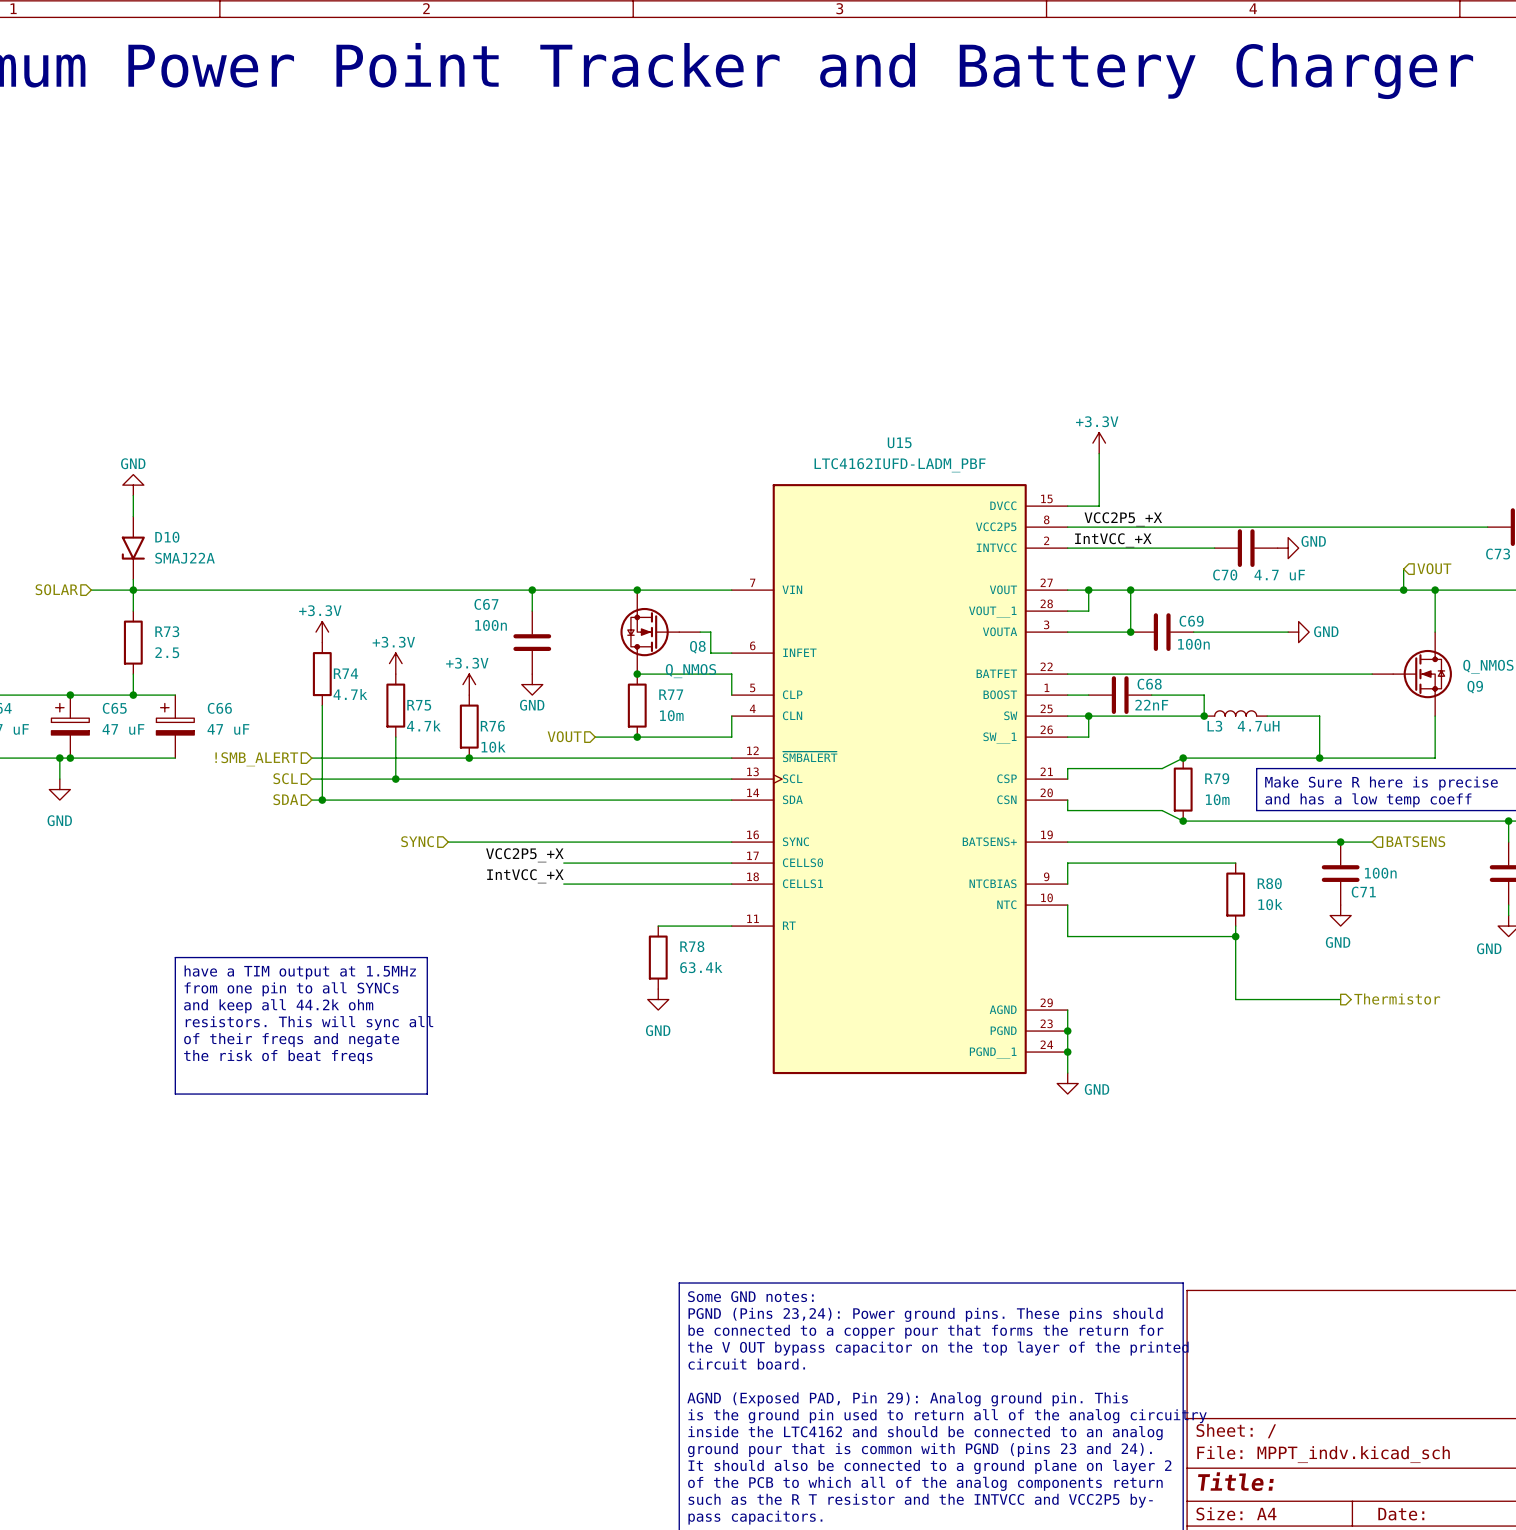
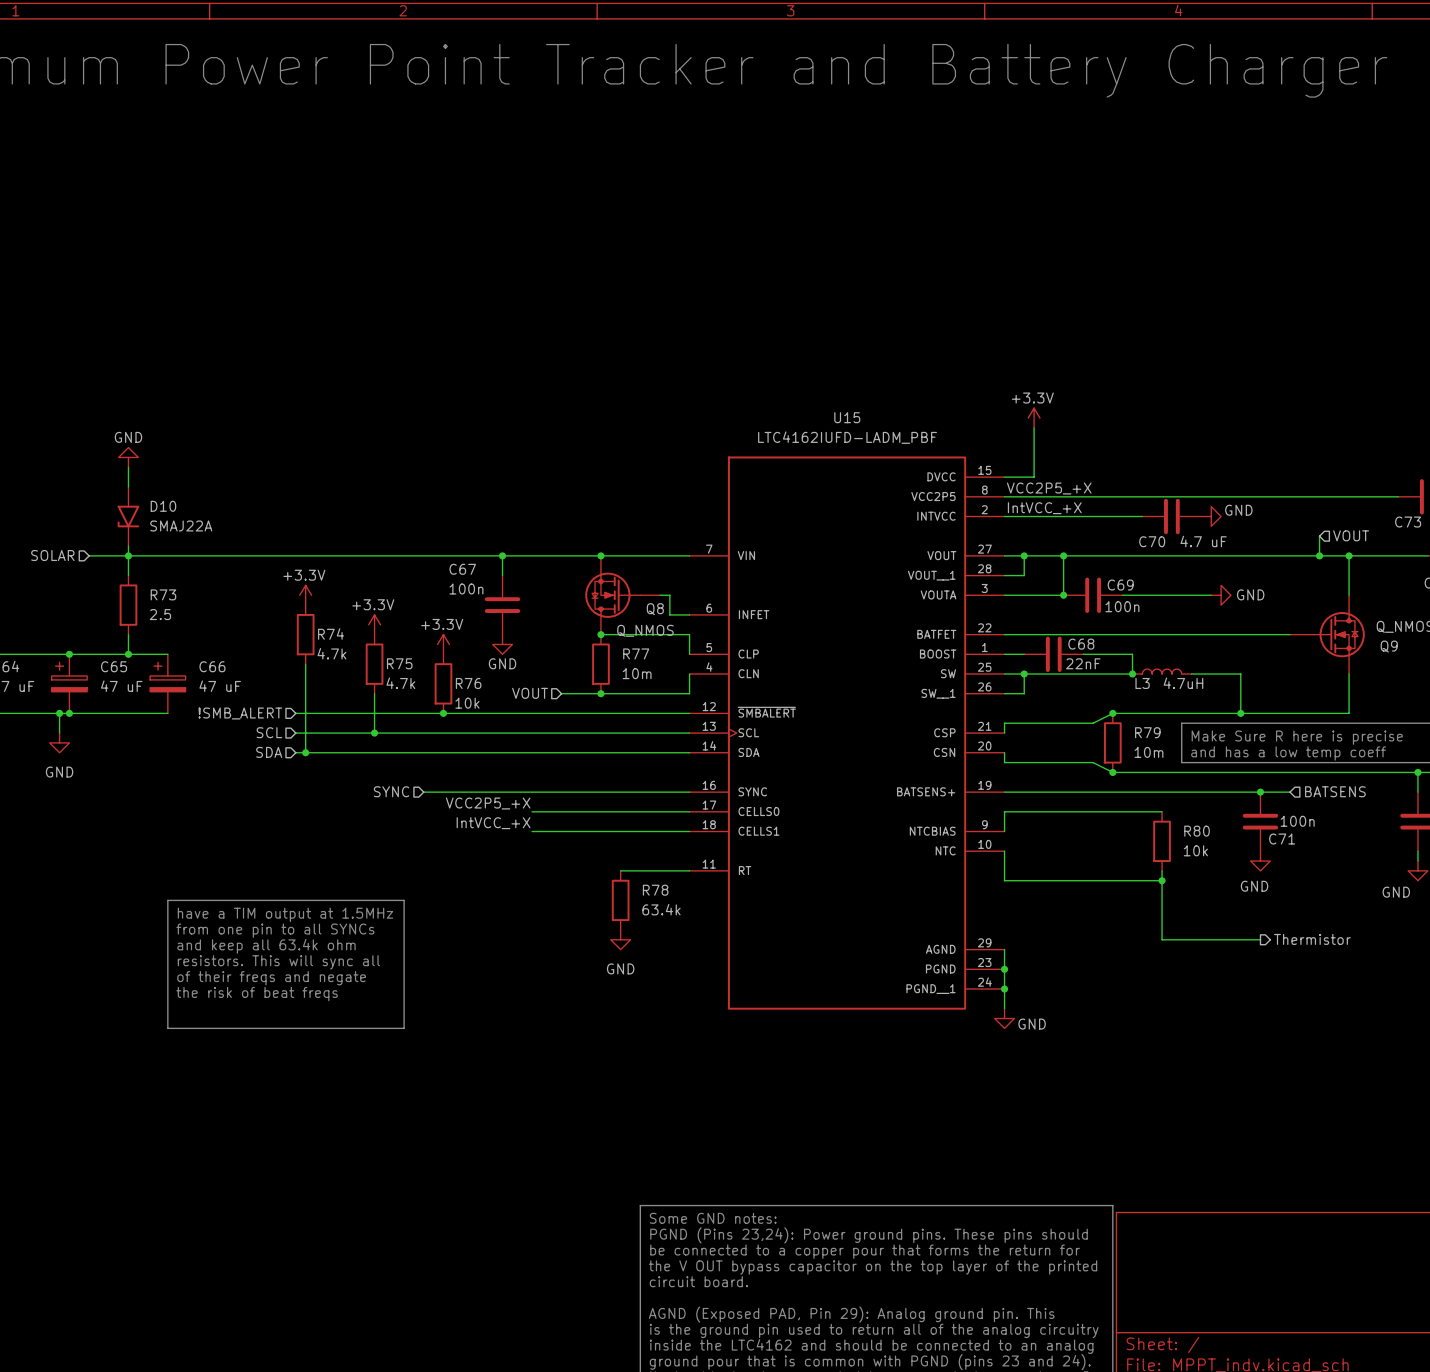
text: and keep all 44.2k ohm (278, 1006) -> and keep all 63.4k ohm (266, 946)

